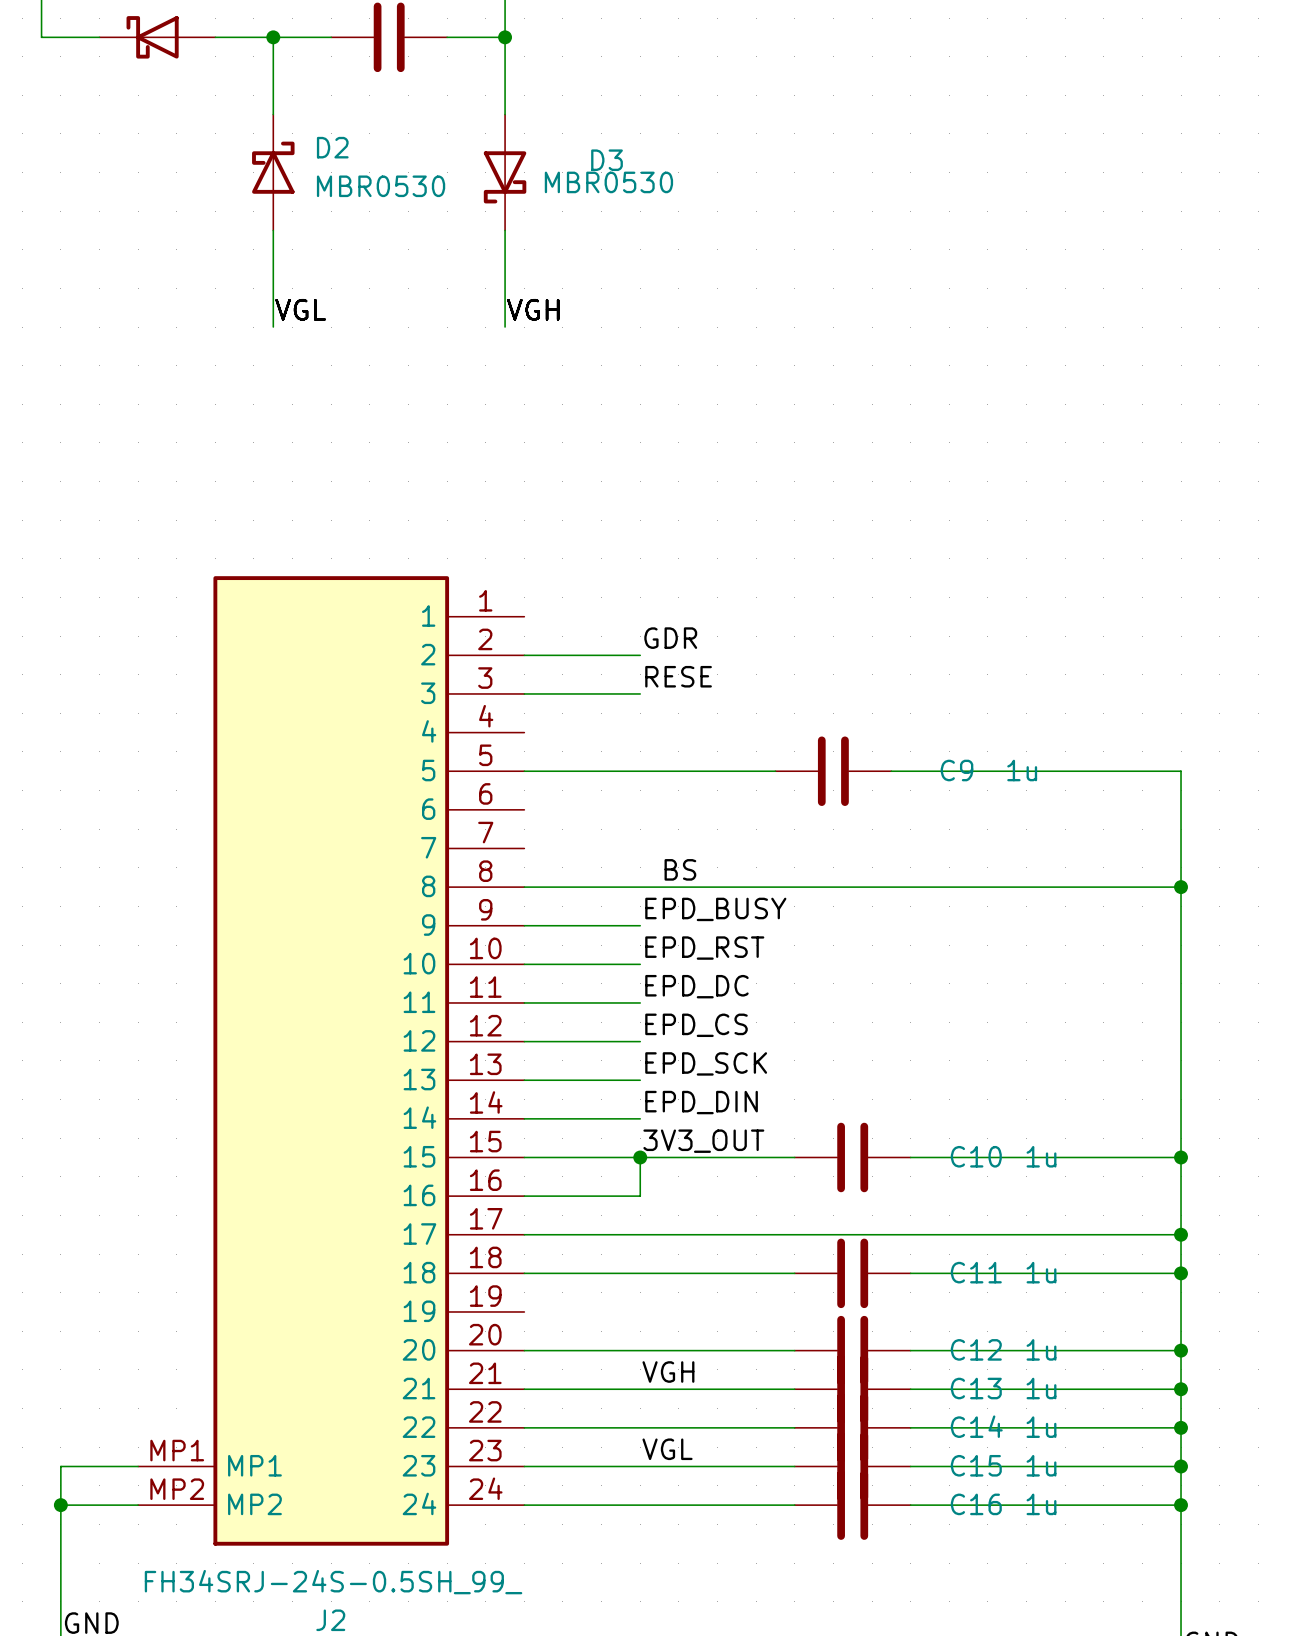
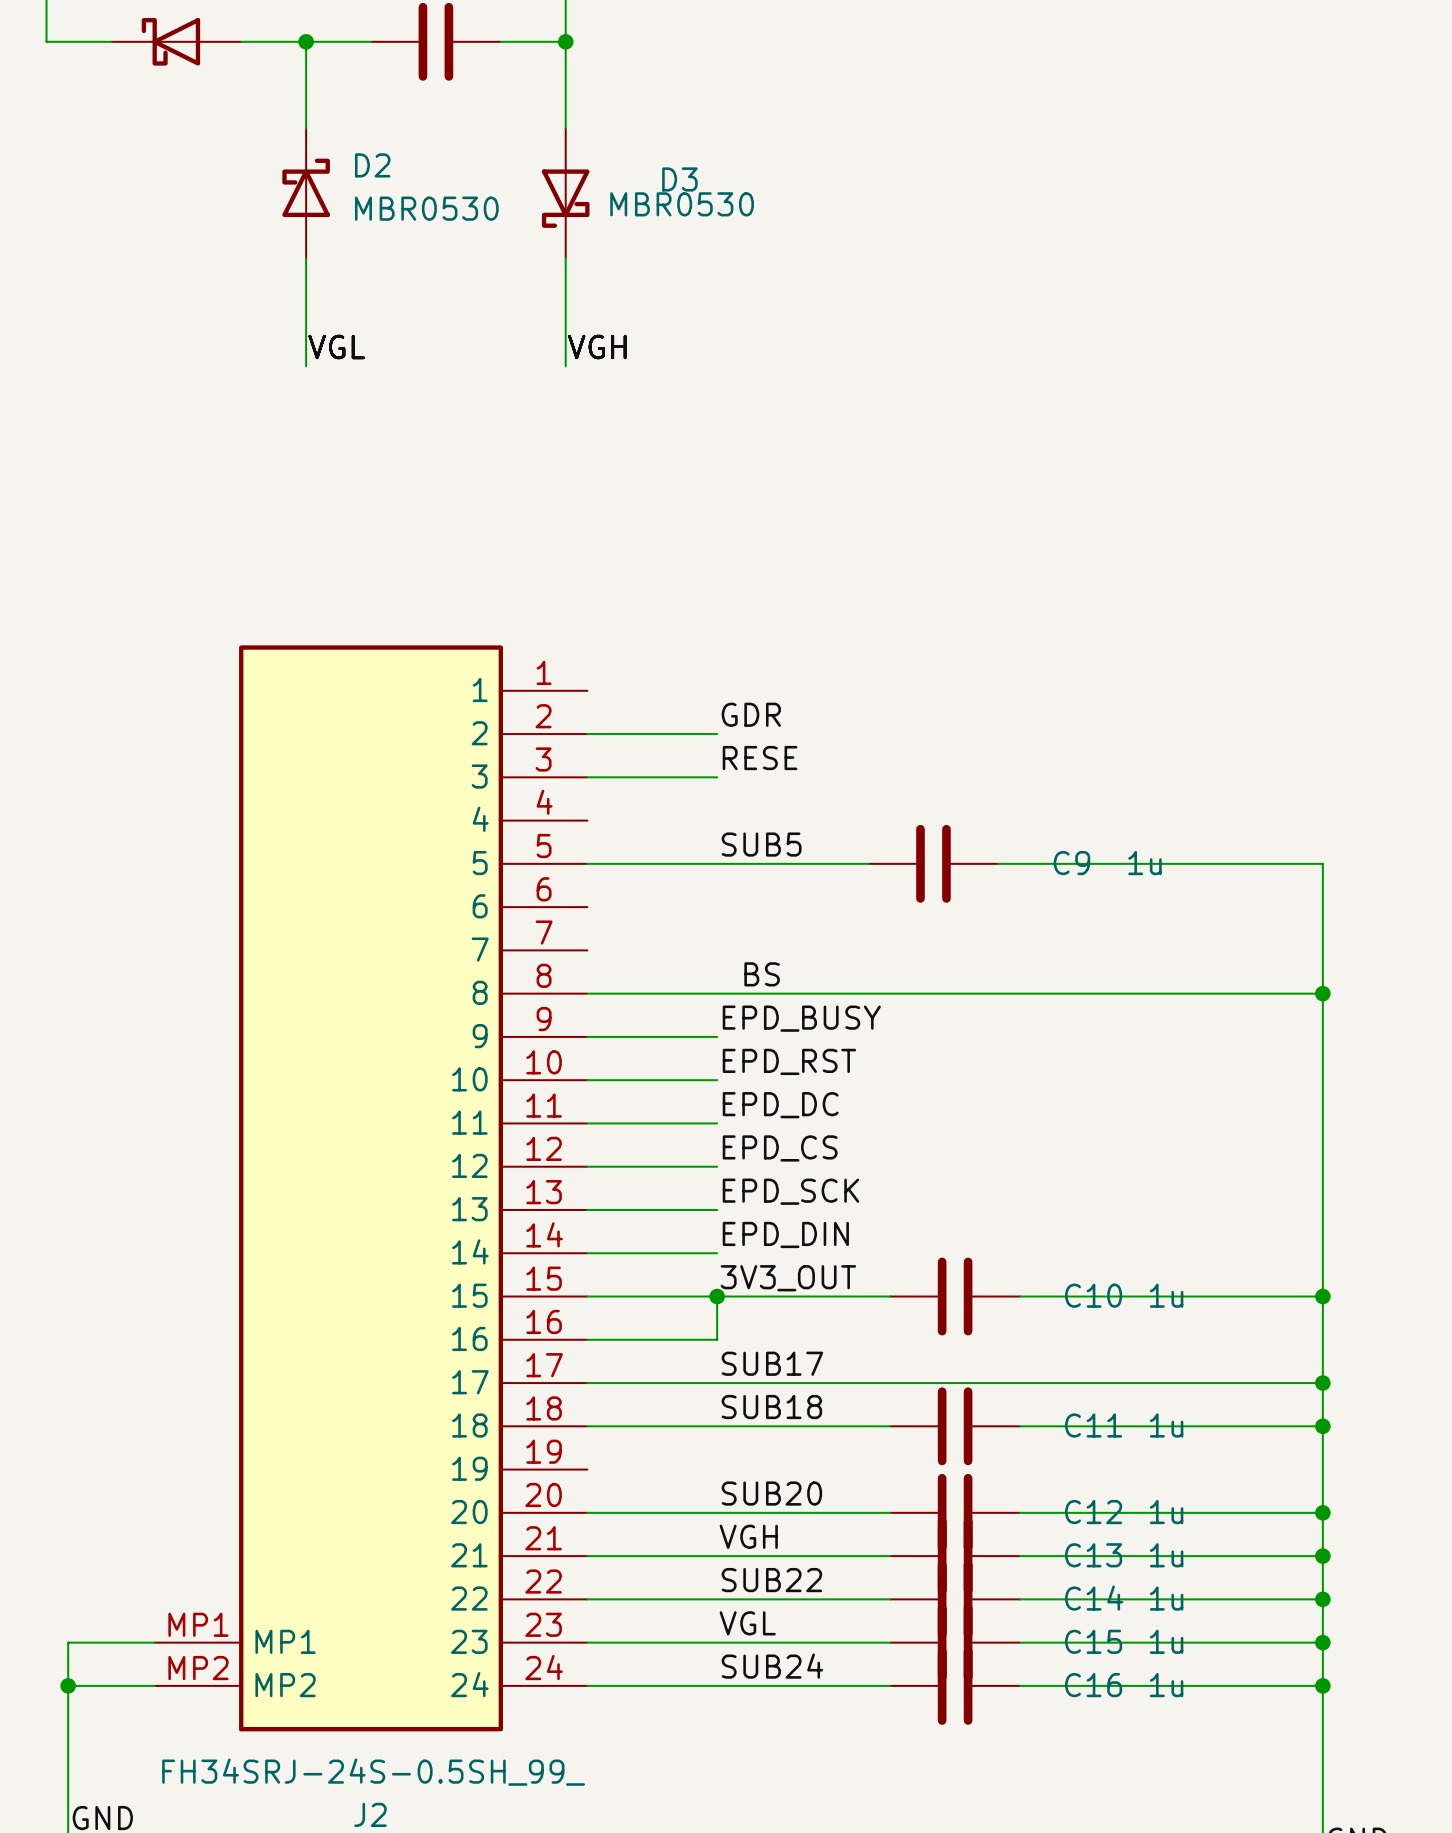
label: none -> SUB5 (761, 844)
label: none -> SUB17 (772, 1363)
label: none -> SUB18 (771, 1407)
label: none -> SUB20 (771, 1493)
label: none -> SUB22 (771, 1580)
label: none -> SUB24 (772, 1666)

